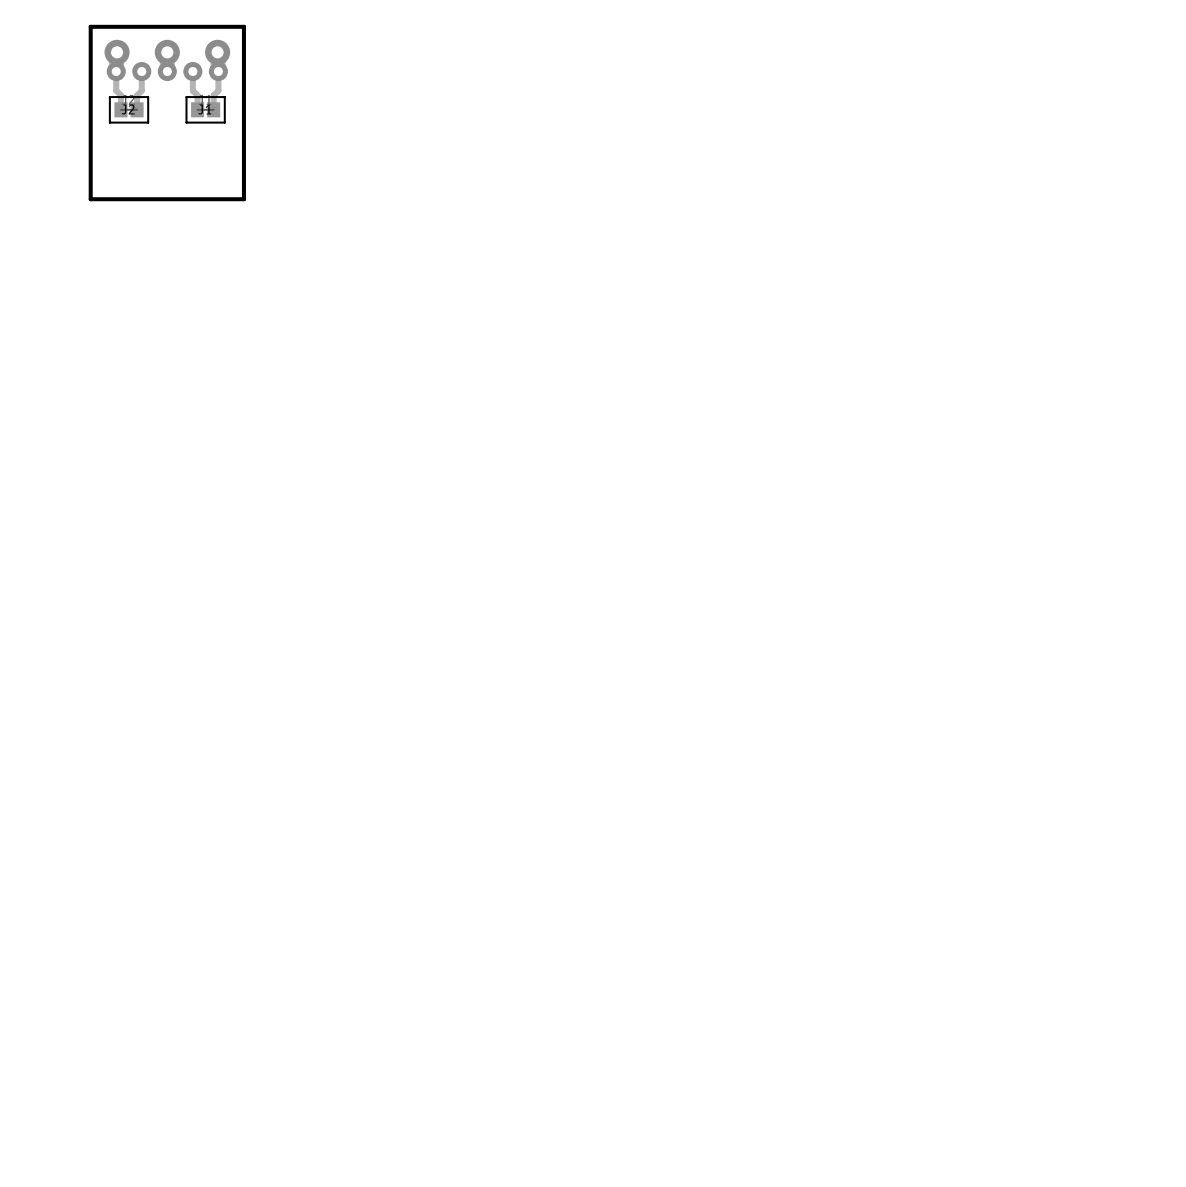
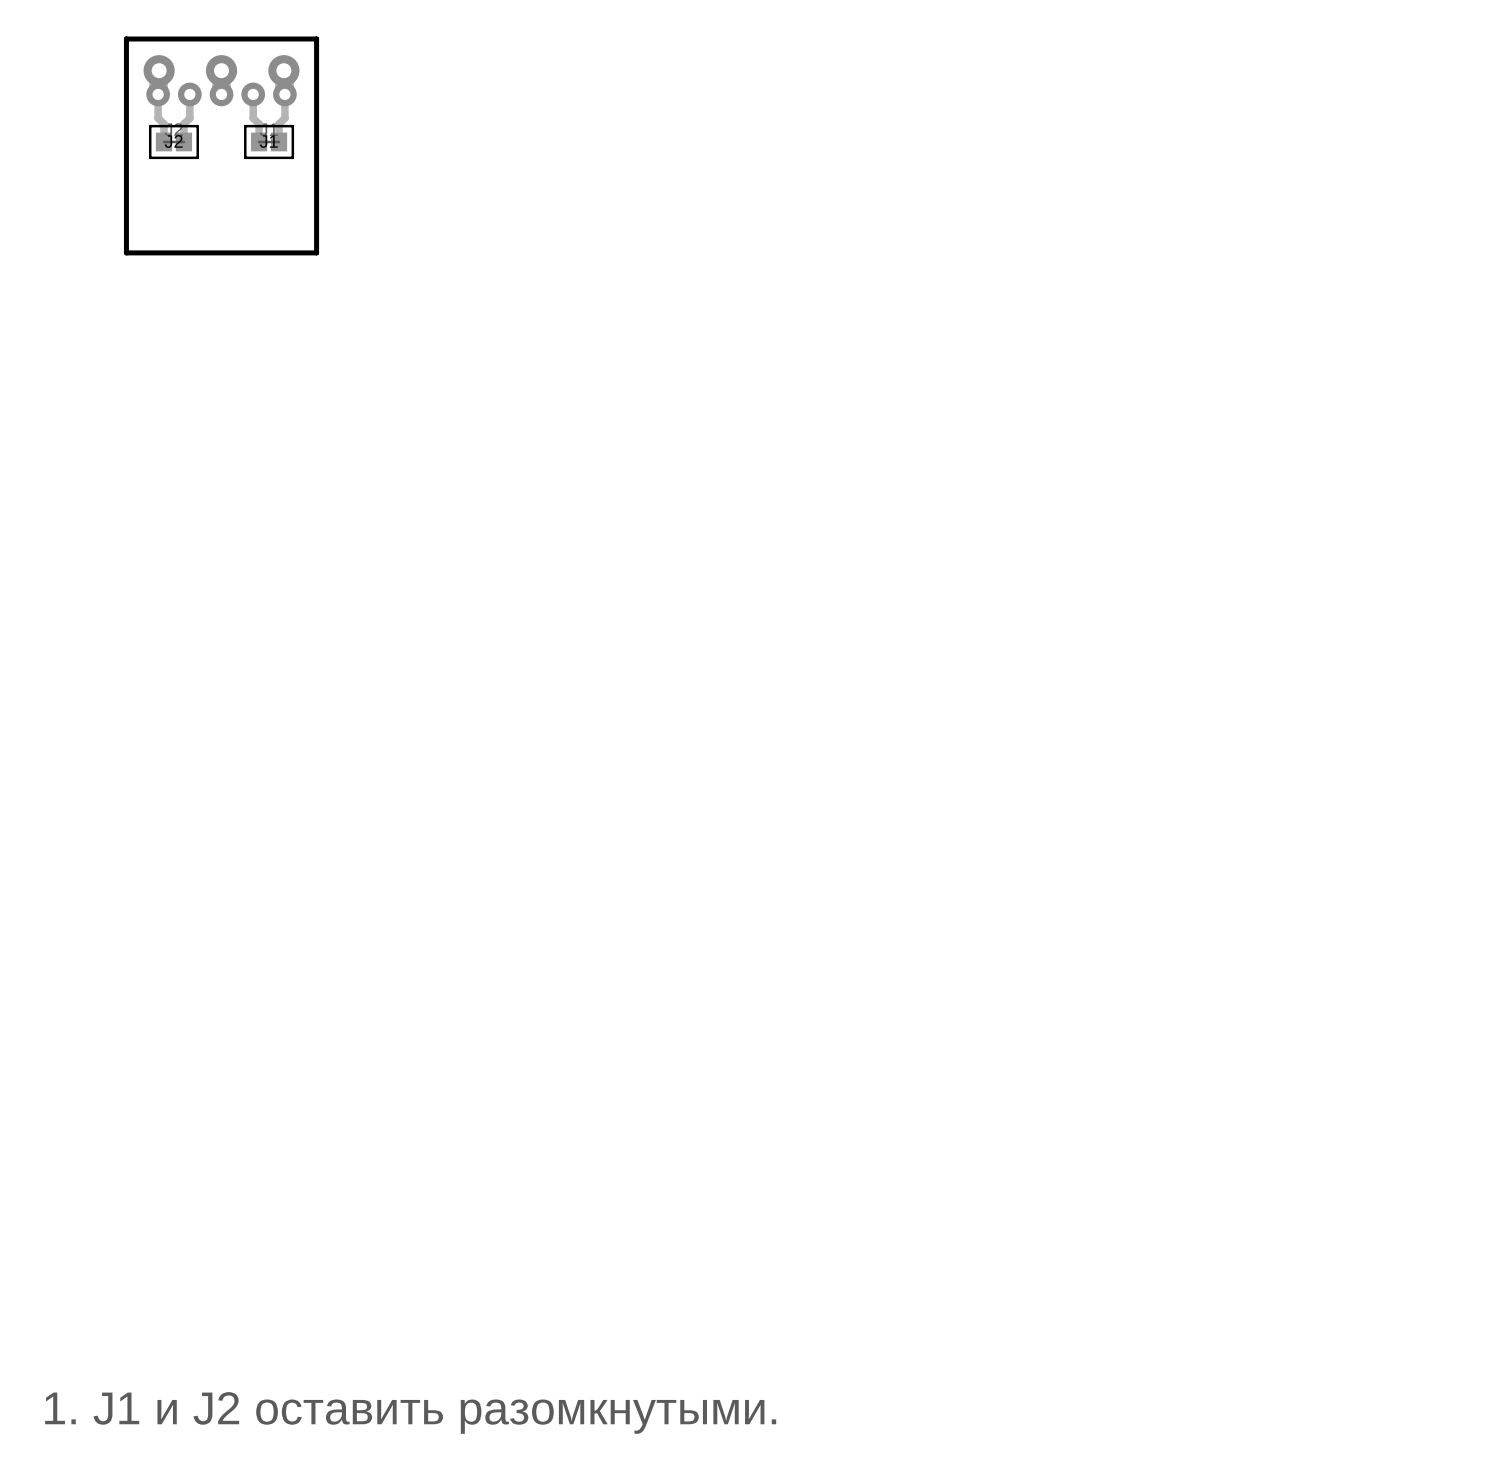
text: none -> 1. J1 и J2 оставить разомкнутыми. (410, 1412)

